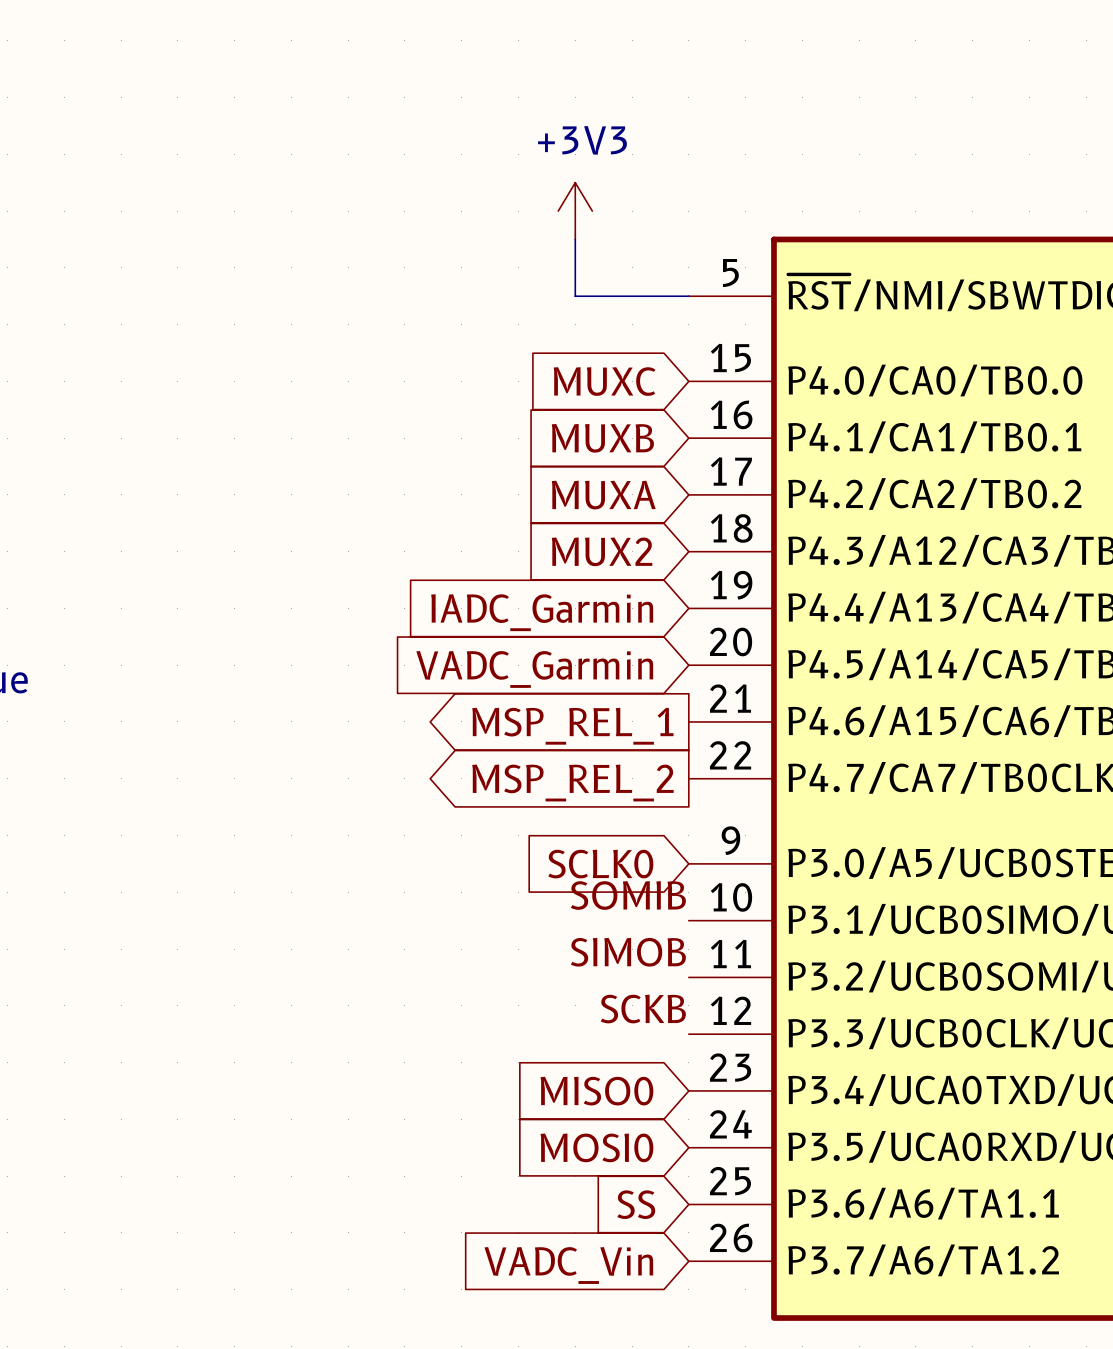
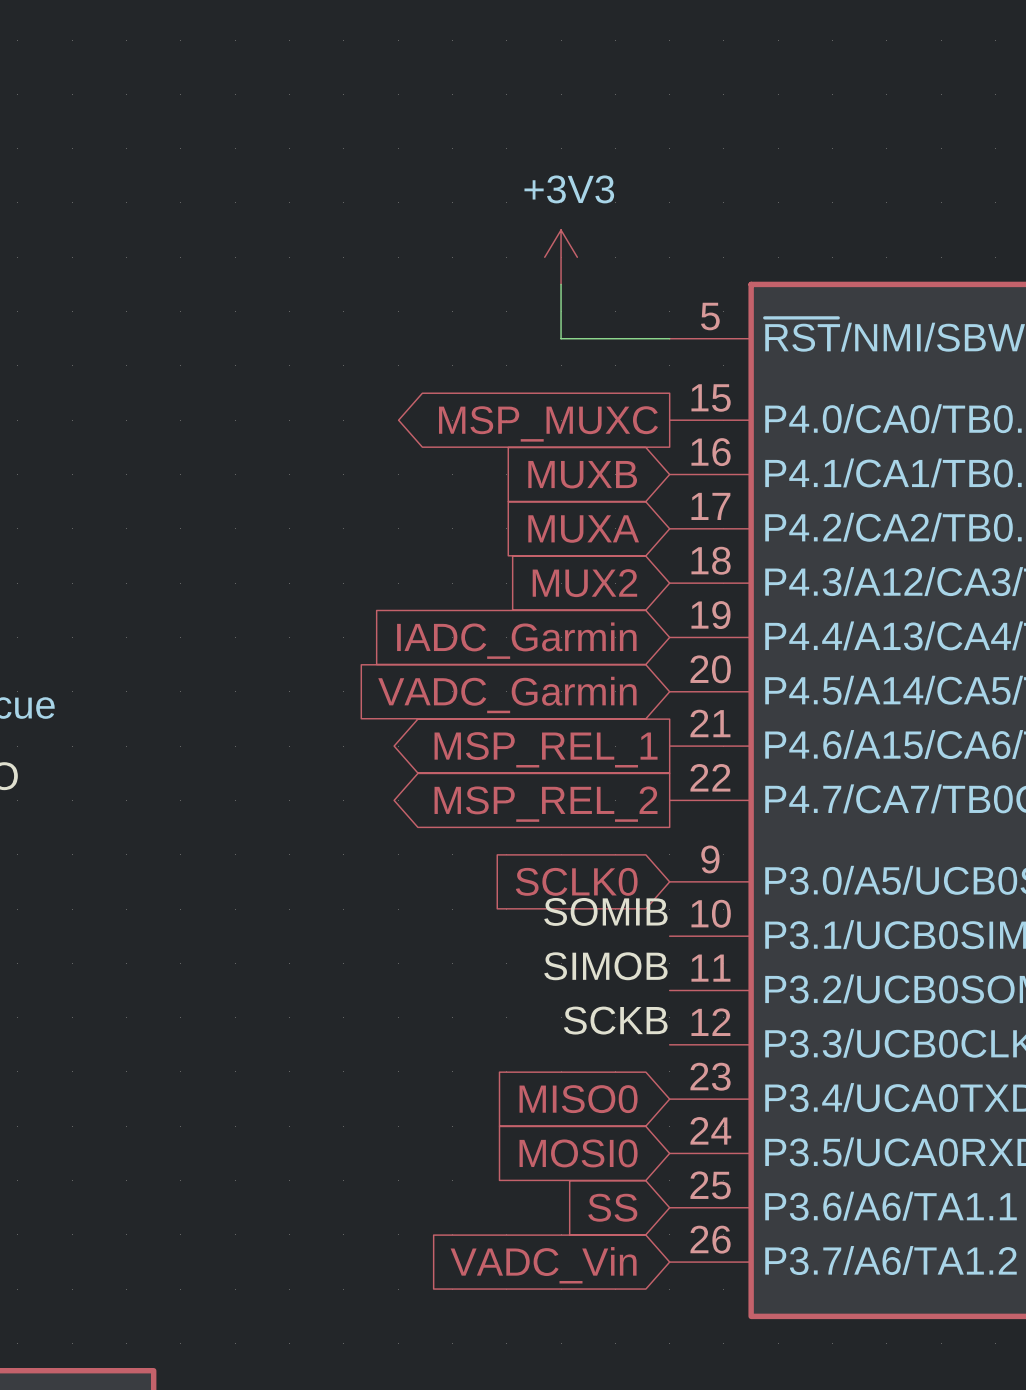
global label shape: input (604, 381) -> output (548, 423)
global label: MUXC (604, 381) -> MSP_MUXC (548, 423)

